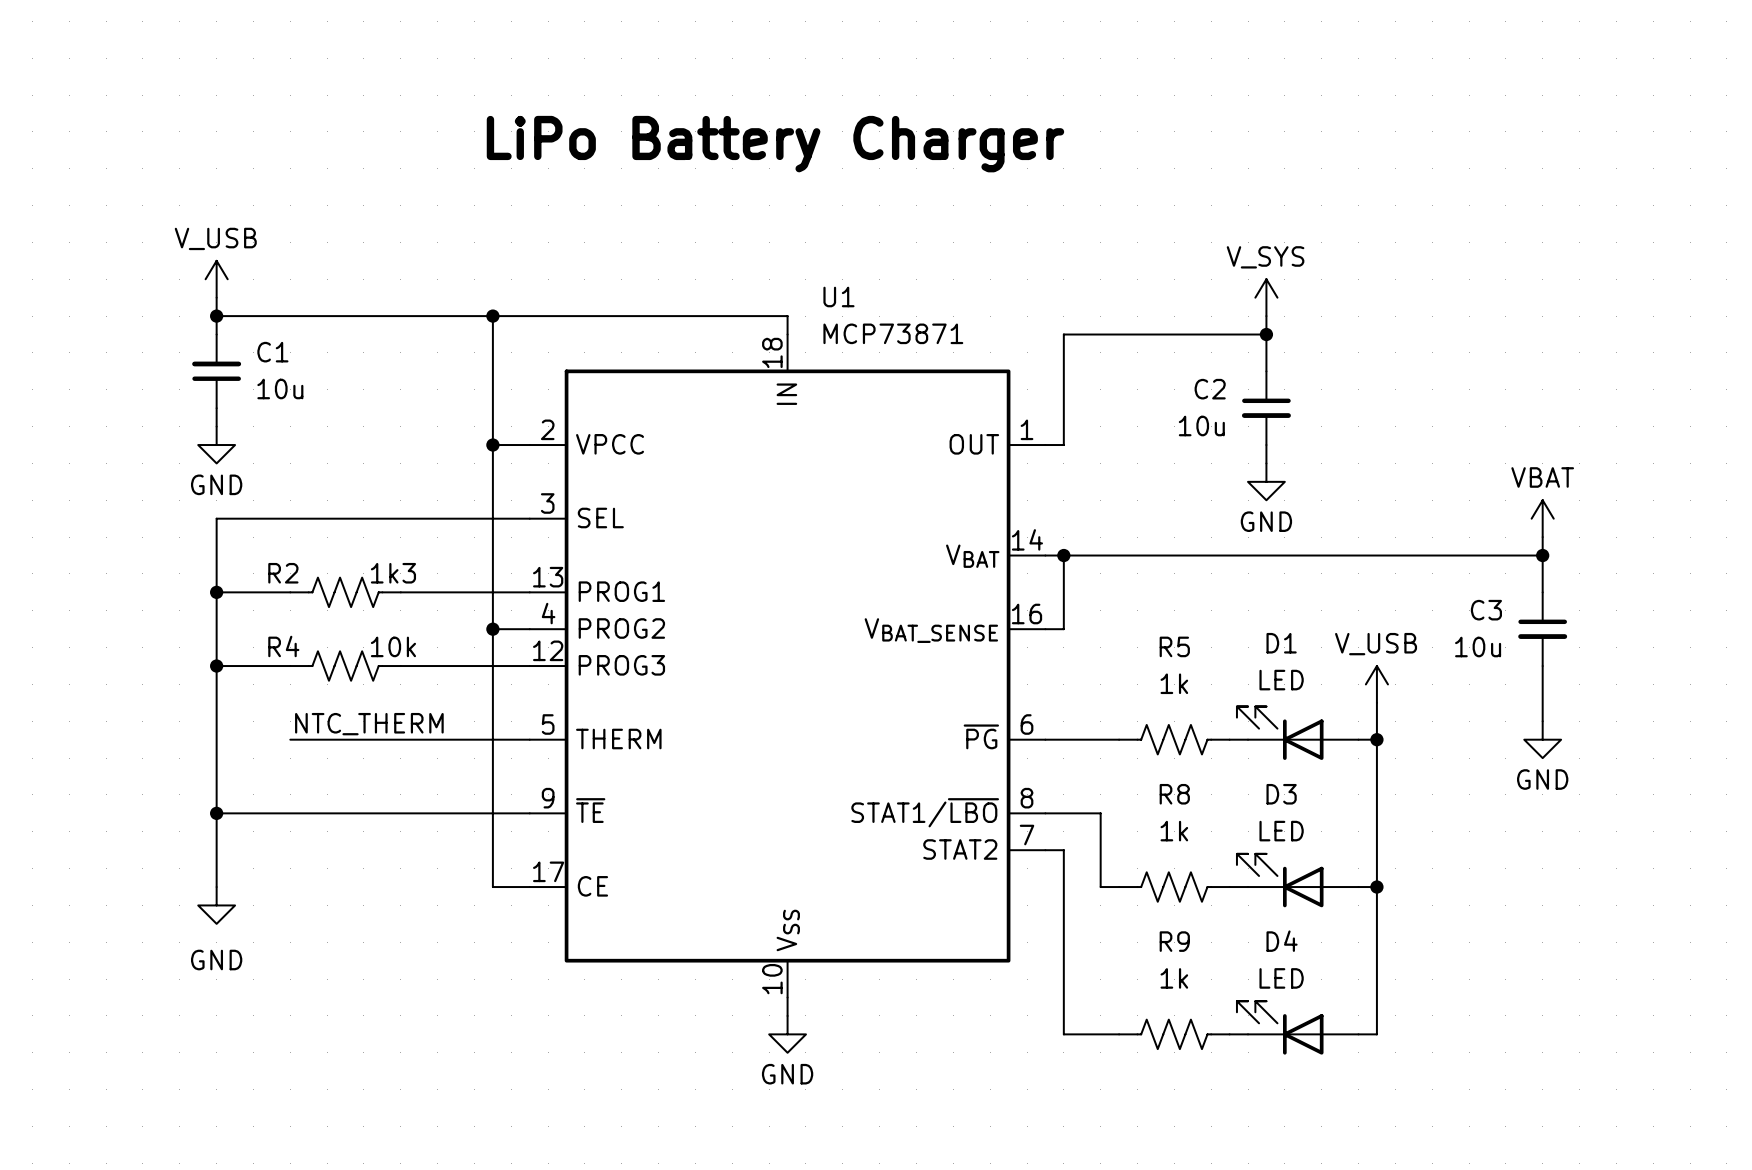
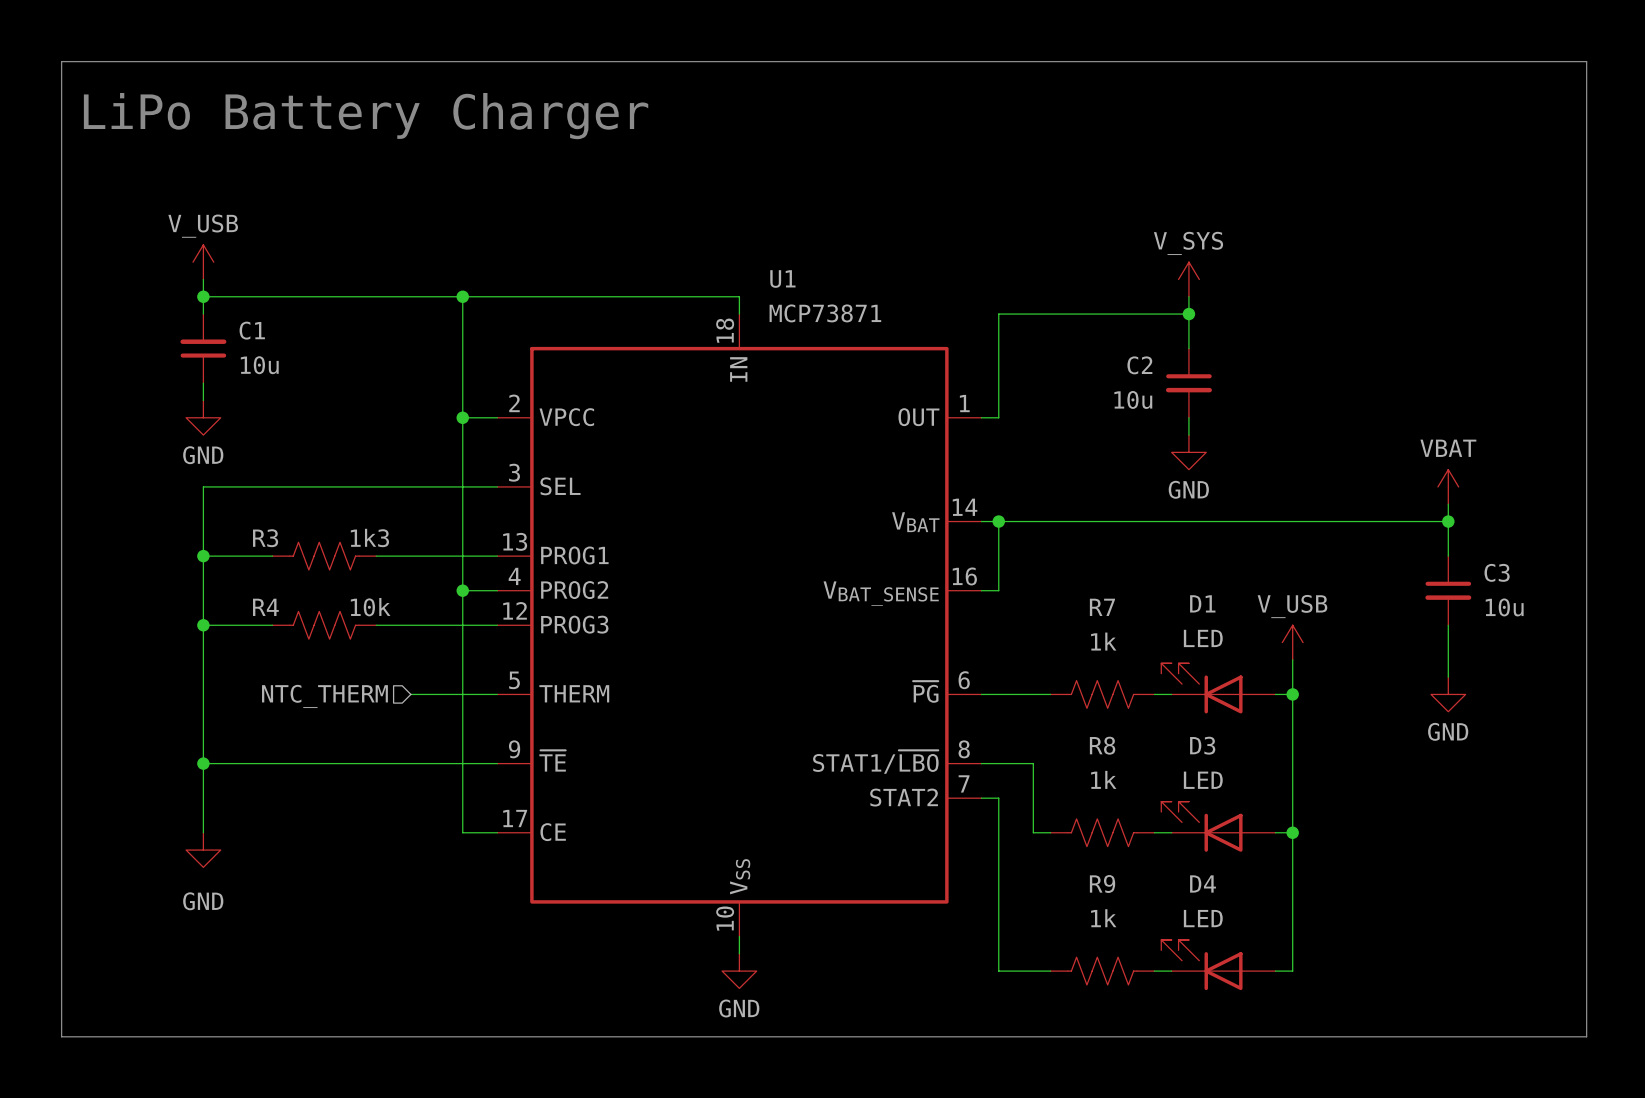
line: none -> (61, 61) (1586, 61) (1586, 1036) (61, 1036) (61, 61)
text: none -> LiPo Battery Charger (366, 116)
text: LiPo Battery Charger (775, 144) -> none
R2 name: R2 (283, 573) -> R3 (265, 538)
C3 name position: C3 (1486, 610) -> C3 (1497, 572)
R5 name: R5 (1174, 646) -> R7 (1102, 607)
C3 value position: 10u (1478, 647) -> 10u (1504, 607)
label: NTC_THERM (369, 724) -> none
wire: (290, 739) (437, 739) -> none
hierarchical label: none -> NTC_THERM (324, 696)

